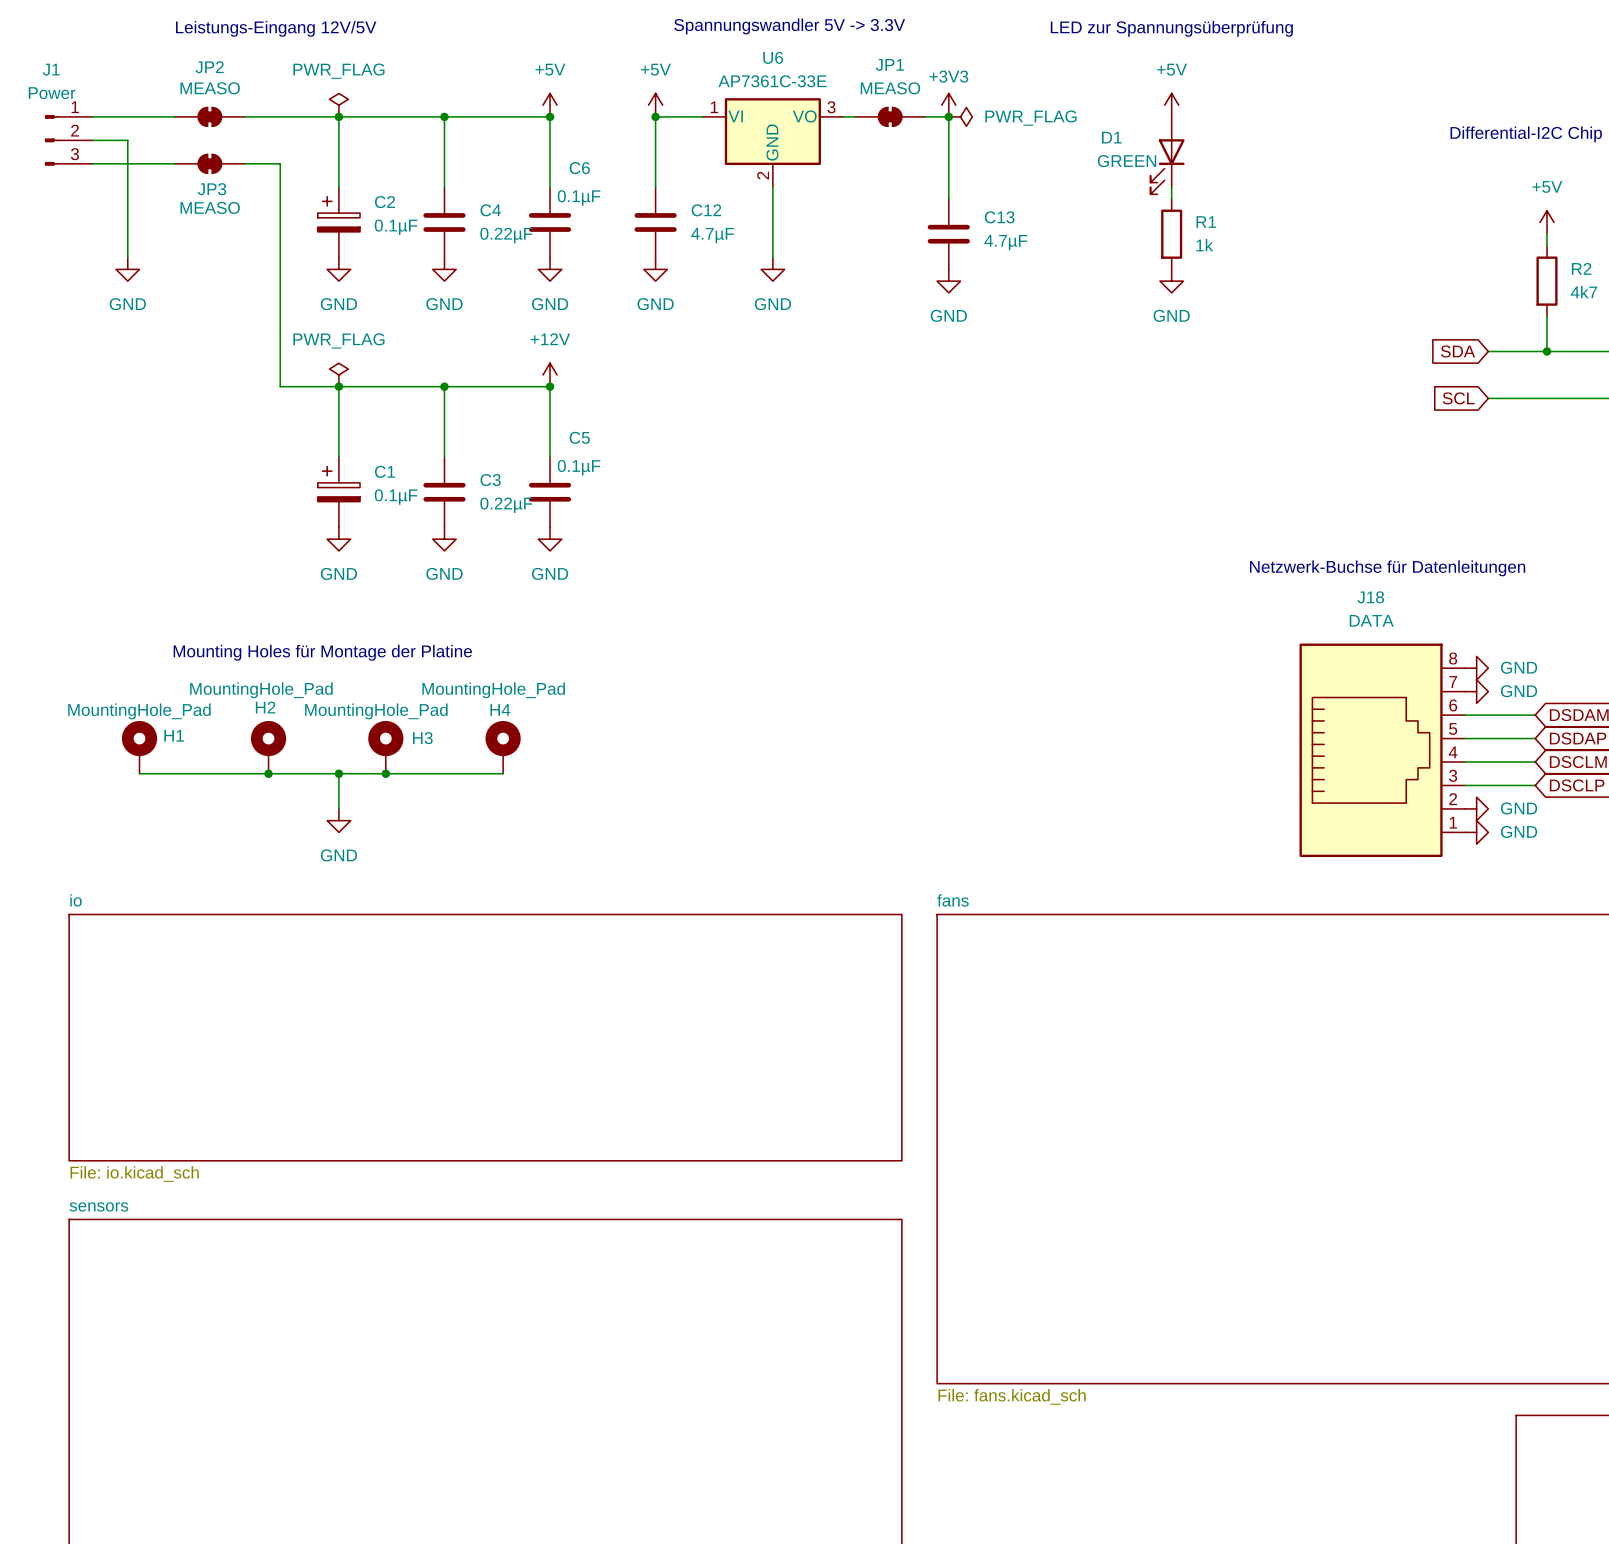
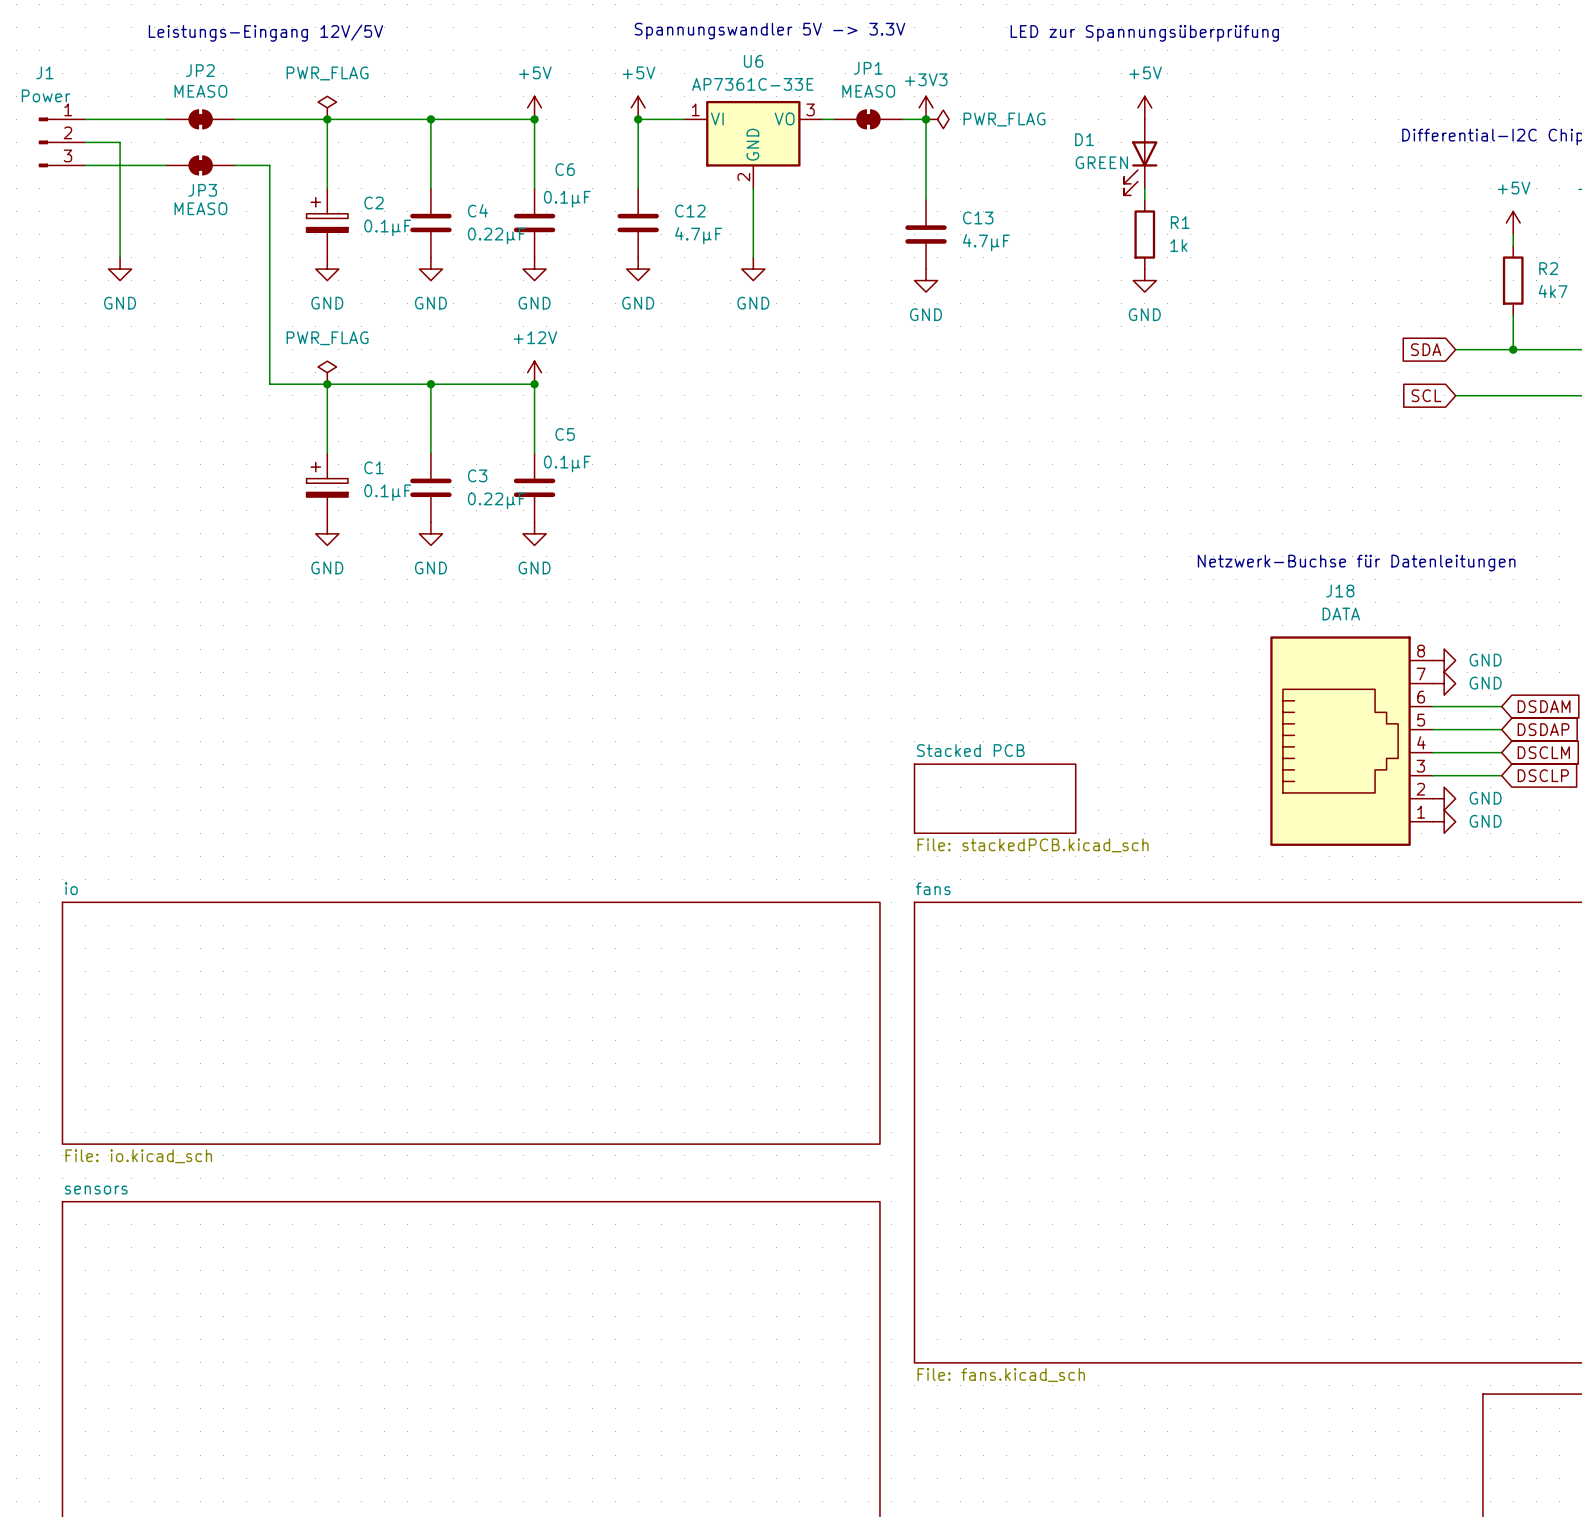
text: Mounting Holes für Montage der Platine (322, 652) -> none
H1: MountingHole_Pad (139, 747) -> none
H2: MountingHole_Pad (268, 747) -> none
H3: MountingHole_Pad (385, 747) -> none
H4: MountingHole_Pad (503, 747) -> none
wire: (139, 773) (503, 773) -> none
junction: (268, 773) -> none
wire: (338, 773) (338, 808) -> none
junction: (338, 773) -> none
junction: (385, 773) -> none
sheet Stacked PCB: none -> File: stackedPCB.kicad_sch (995, 798)
power symbol: GND (338, 820) -> none

